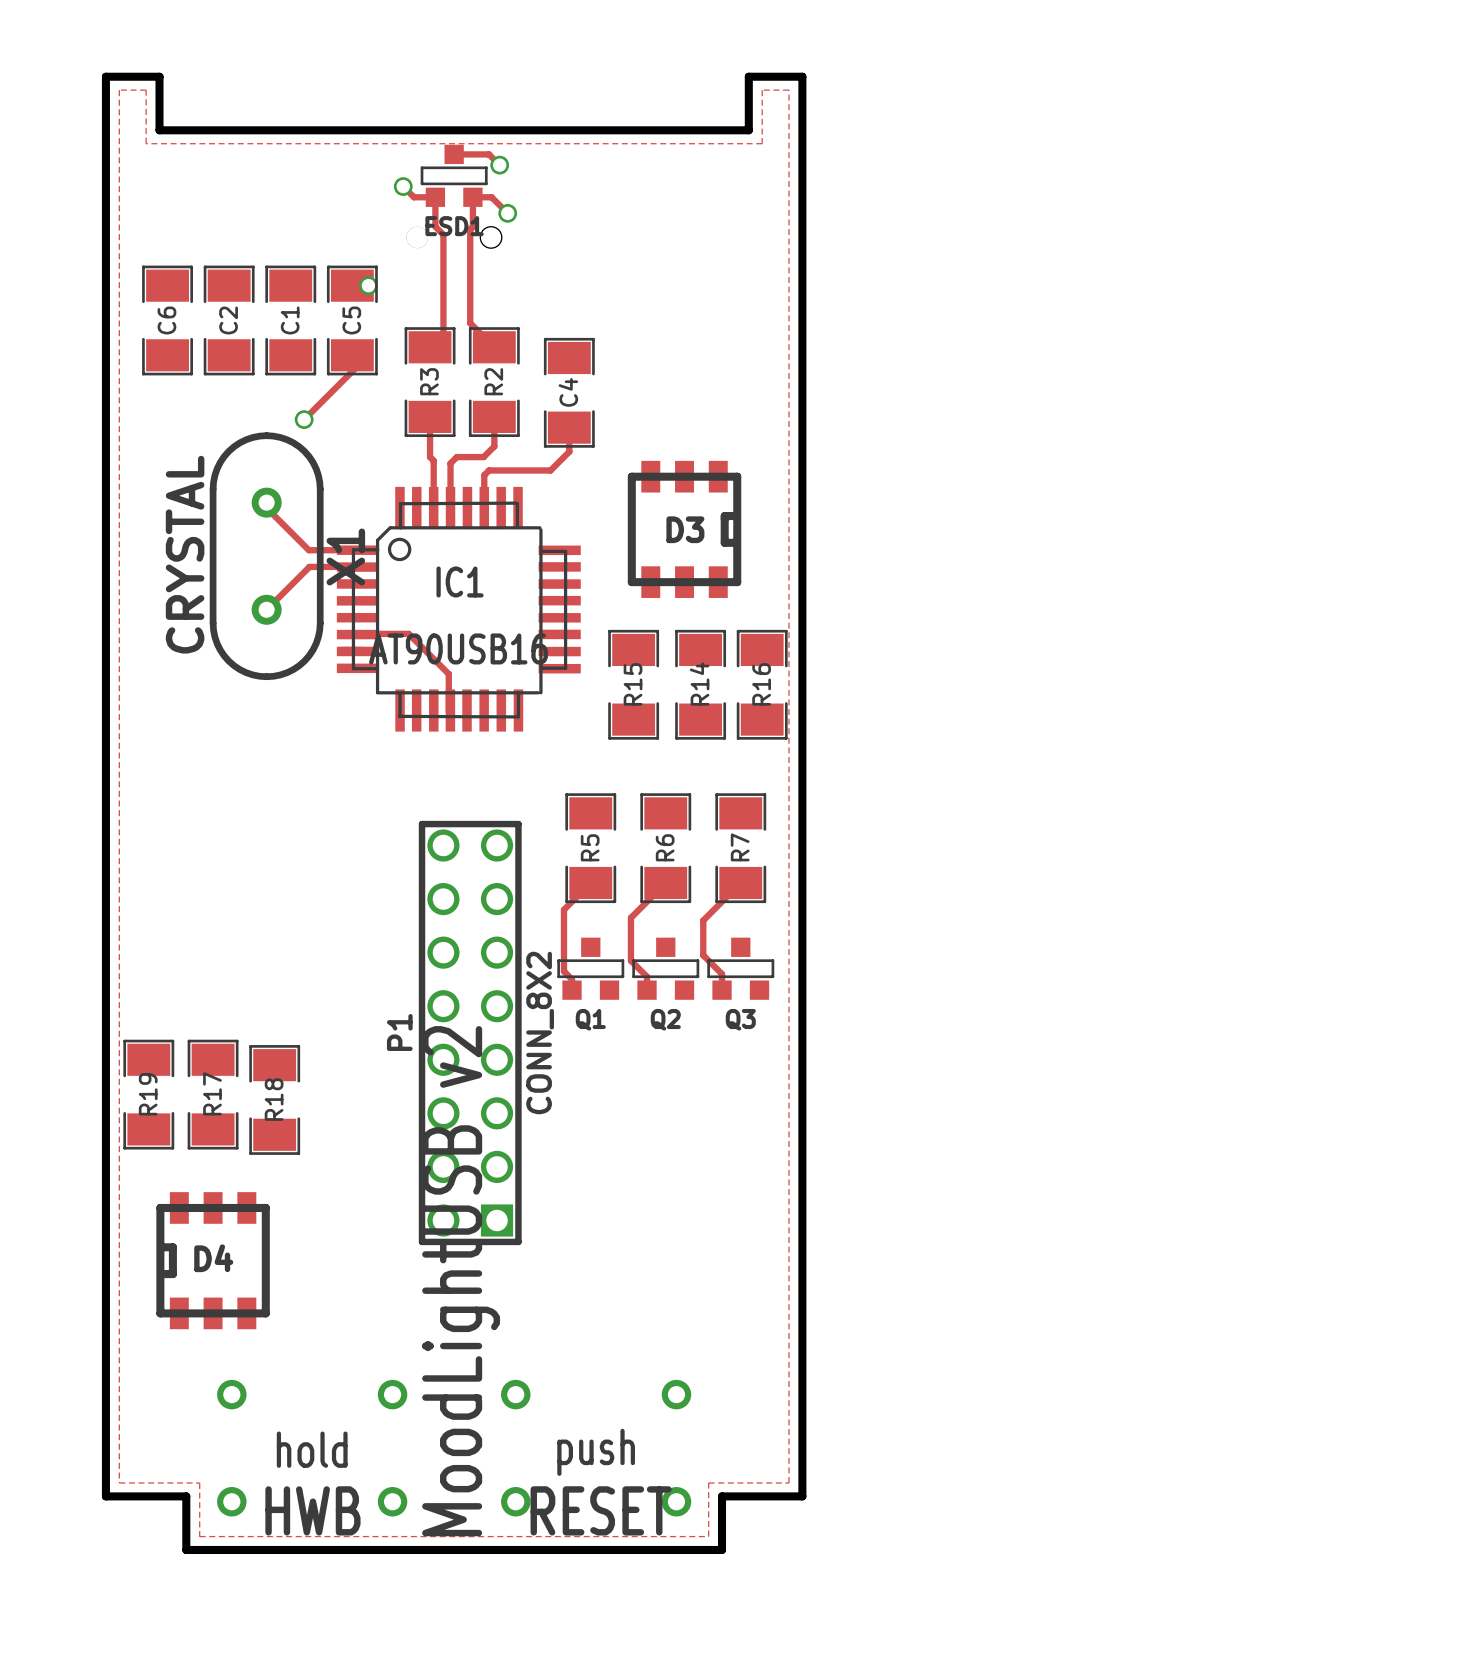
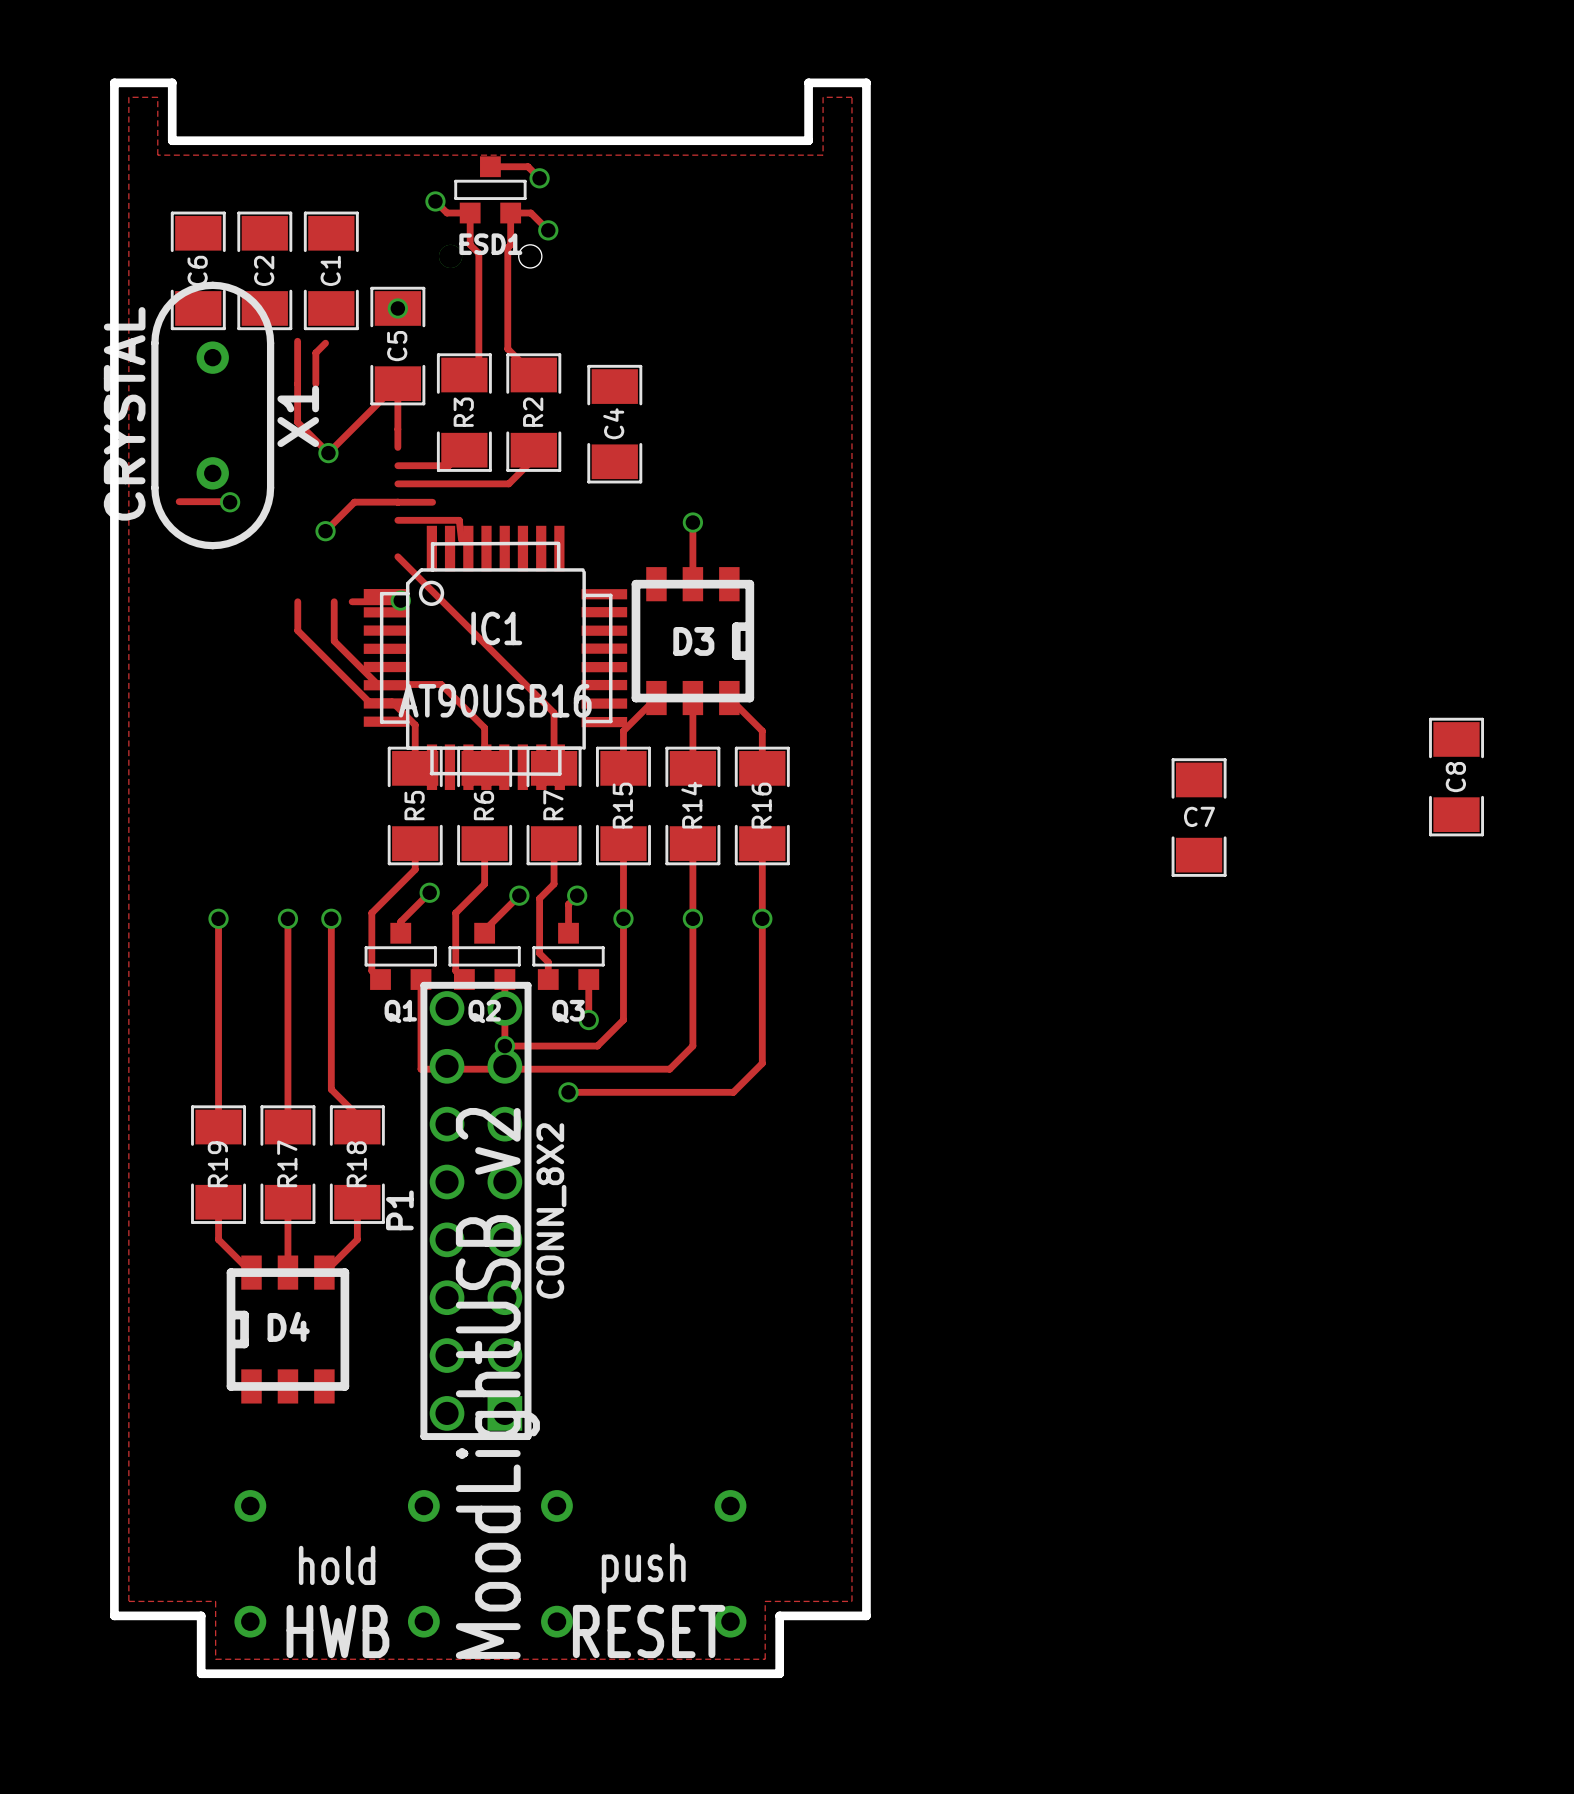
track: none -> (297, 341) (297, 422) (328, 453)
track: none -> (325, 343) (315, 352) (315, 383)
C6 position: (167, 320) -> (198, 270)
C2 position: (229, 320) -> (264, 270)
C1 position: (290, 320) -> (331, 270)
C5 position: (352, 320) -> (397, 346)
track: none -> (397, 383) (397, 447)
track: (430, 416) (430, 457) (433, 460) (433, 507) -> (464, 450) (448, 465) (397, 465)
track: (494, 424) (494, 446) (483, 457) (456, 457) (450, 463) (450, 507) -> (533, 458) (508, 483) (397, 483)
track: (569, 427) (569, 451) (550, 470) (488, 470) (484, 475) (484, 507) -> none
track: none -> (179, 501) (230, 502)
via: none -> (230, 502)
track: none -> (397, 502) (354, 502) (325, 531)
track: none -> (397, 502) (432, 502)
track: none -> (397, 520) (459, 520) (461, 539)
track: none -> (692, 522) (692, 584)
via: none -> (692, 522)
via: none -> (325, 531)
track: (266, 502) (266, 507) (308, 550) (357, 550) -> none
track: none -> (397, 556) (554, 712) (554, 768)
D3 position: (684, 529) -> (692, 641)
X1 position: (266, 556) -> (212, 415)
track: none -> (400, 600) (352, 601)
via: none -> (400, 600)
track: none -> (297, 601) (297, 630) (368, 701)
track: none -> (334, 601) (334, 641) (377, 684)
track: (357, 566) (309, 566) (266, 609) -> none
track: none -> (656, 698) (623, 731) (623, 768)
track: none -> (692, 698) (692, 768)
track: none -> (729, 698) (762, 731) (762, 768)
track: none -> (392, 701) (415, 724) (415, 768)
R15 position: (633, 684) -> (623, 805)
R14 position: (700, 684) -> (692, 805)
R16 position: (762, 684) -> (762, 805)
C8: none -> (1456, 777)
C7: none -> (1199, 817)
track: none -> (415, 843) (415, 869) (371, 913) (371, 970) (380, 979)
track: none -> (484, 843) (484, 884) (455, 913) (455, 970) (464, 979)
track: none -> (554, 843) (554, 884) (539, 898) (539, 953) (548, 962) (548, 979)
track: none -> (623, 843) (623, 1020) (597, 1046) (504, 1046) (504, 979)
track: none -> (692, 843) (692, 1046) (669, 1069) (421, 1069) (421, 979)
track: none -> (762, 843) (762, 1063) (733, 1092) (568, 1092)
track: none -> (429, 892) (400, 921) (400, 933)
via: none -> (429, 892)
track: none -> (519, 895) (484, 930) (484, 933)
via: none -> (519, 895)
track: none -> (577, 895) (568, 904) (568, 933)
via: none -> (577, 895)
R5 position: (590, 848) -> (415, 805)
R6 position: (665, 848) -> (484, 805)
R7 position: (740, 848) -> (554, 805)
track: none -> (218, 918) (218, 1127)
via: none -> (218, 918)
track: none -> (287, 918) (287, 1127)
via: none -> (287, 918)
track: none -> (331, 918) (331, 1089) (357, 1115) (357, 1127)
via: none -> (331, 918)
via: none -> (623, 918)
via: none -> (692, 918)
via: none -> (762, 918)
track: (590, 883) (563, 909) (563, 971) (572, 979) (572, 990) -> none
track: (665, 883) (630, 917) (630, 960) (647, 976) (647, 990) -> none
track: (740, 883) (703, 920) (703, 955) (722, 974) (722, 990) -> none
track: none -> (588, 979) (588, 1020)
via: none -> (588, 1020)
via: none -> (504, 1046)
Q1 position: (590, 968) -> (400, 956)
Q2 position: (665, 968) -> (484, 956)
Q3 position: (740, 968) -> (568, 956)
via: none -> (568, 1092)
P1 position: (470, 1033) -> (475, 1210)
R19 position: (148, 1094) -> (218, 1164)
R17 position: (213, 1094) -> (287, 1164)
R18 position: (274, 1099) -> (357, 1164)
track: none -> (218, 1202) (218, 1239) (251, 1272)
track: none -> (287, 1202) (287, 1272)
track: none -> (357, 1202) (357, 1239) (324, 1272)
D4 position: (213, 1260) -> (287, 1329)

